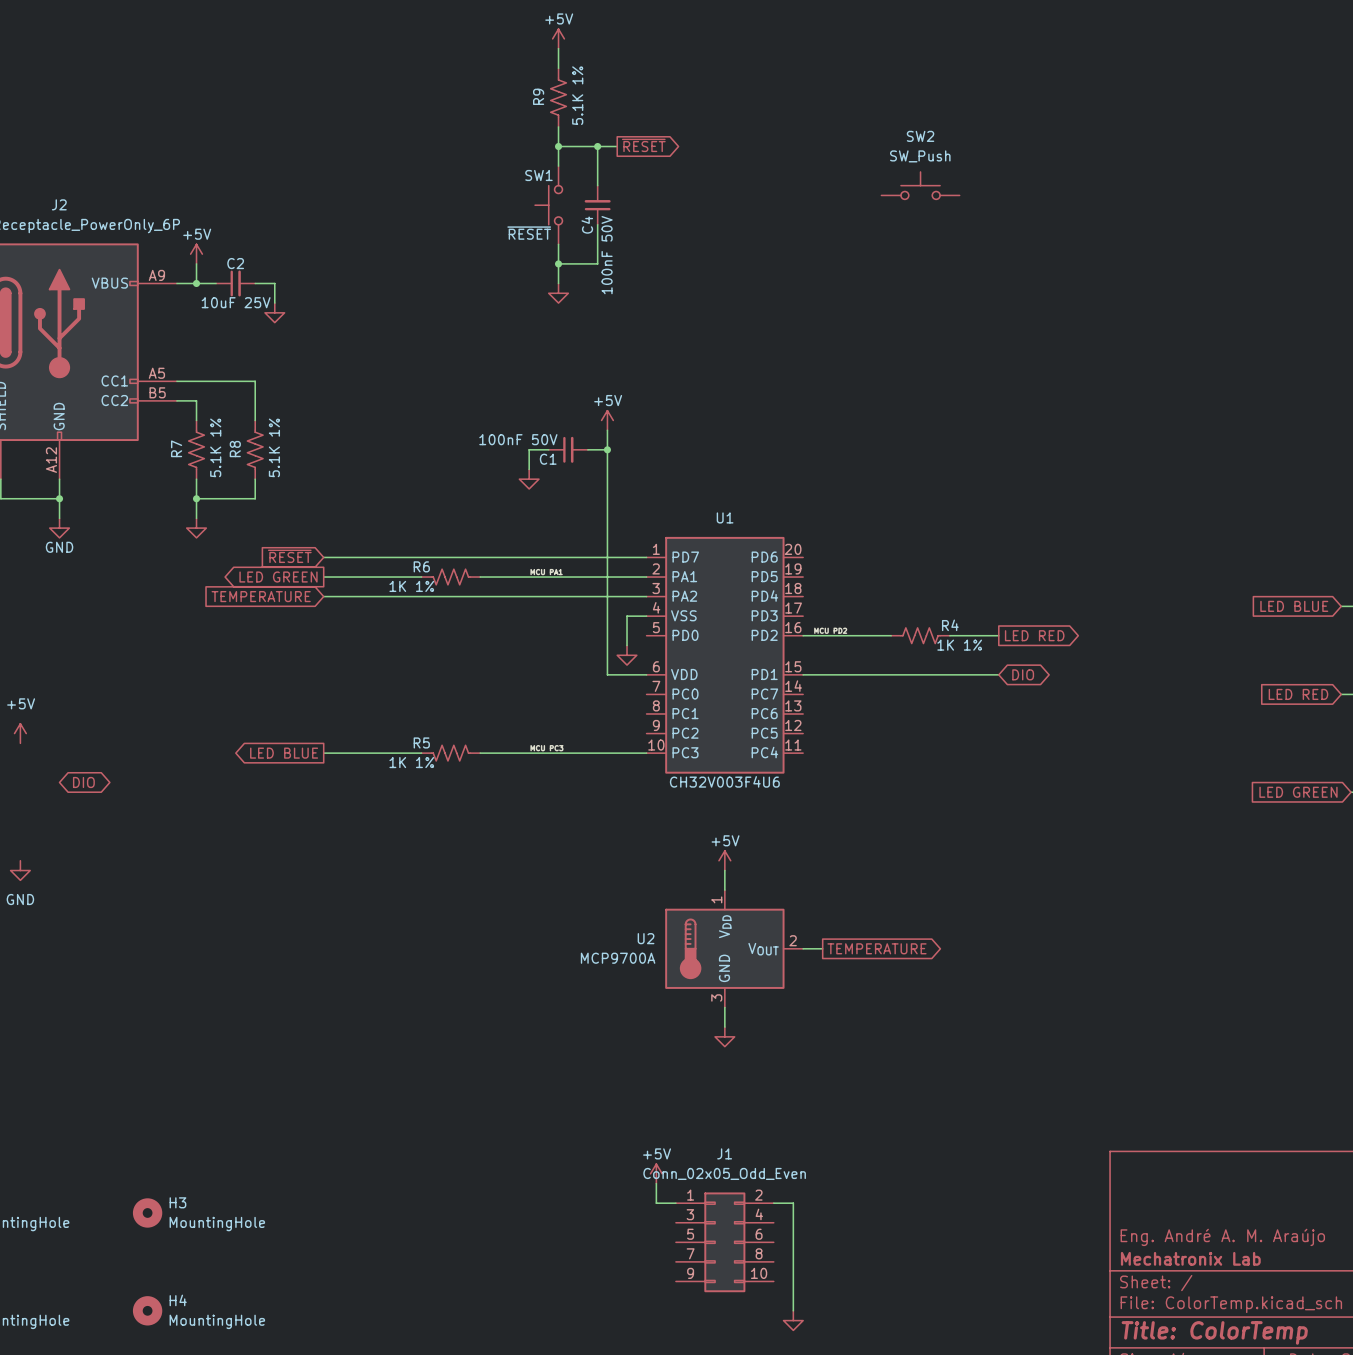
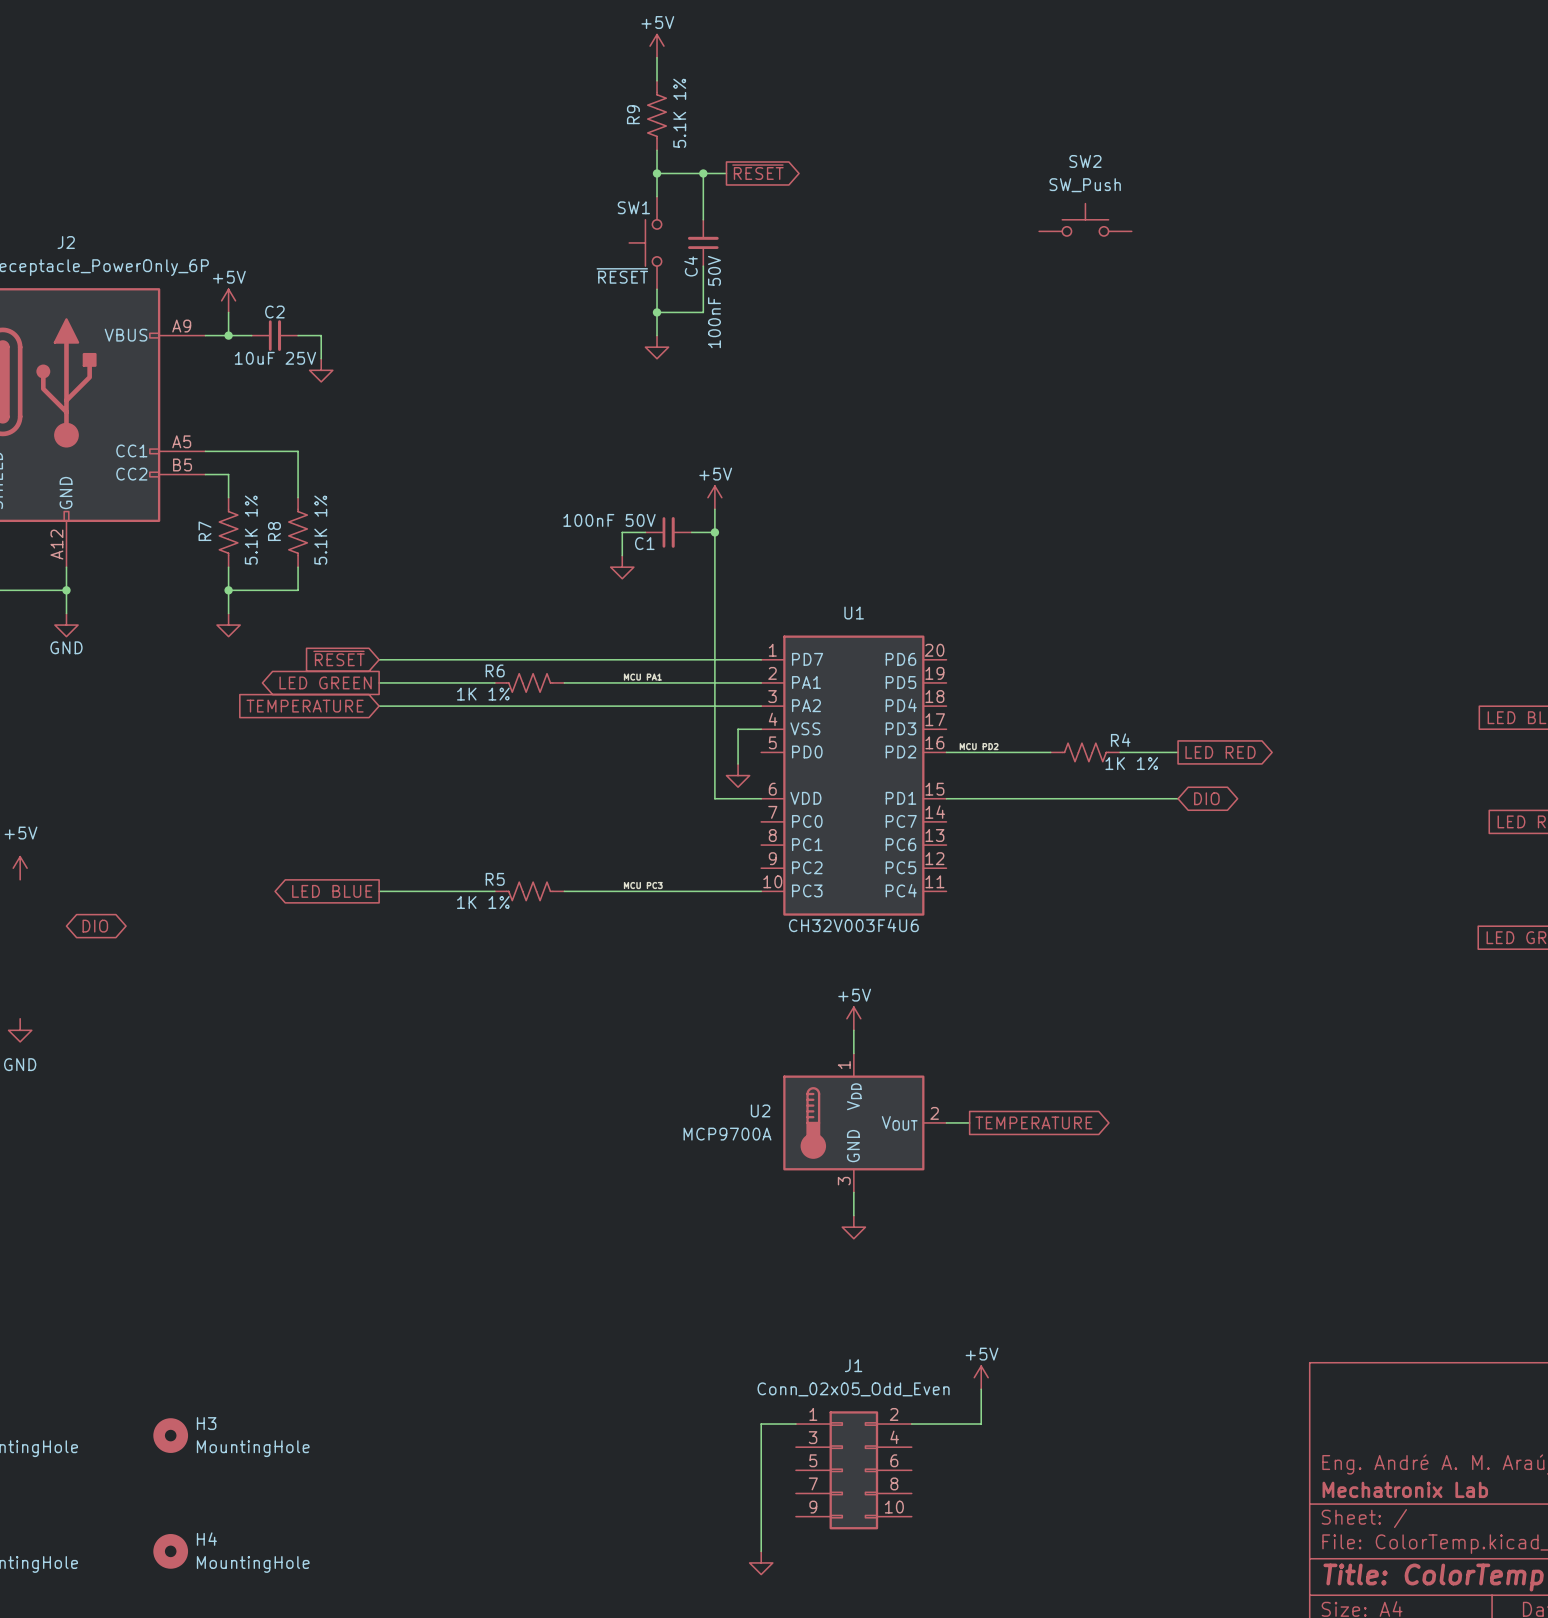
power symbol position: +5V (656, 1173) -> +5V (981, 1377)
wire: (656, 1183) (656, 1203) -> (761, 1551) (761, 1424) (772, 1424)
wire: (793, 1203) (793, 1310) -> (934, 1424) (981, 1424) (981, 1389)
power symbol position: (793, 1320) -> (761, 1562)

